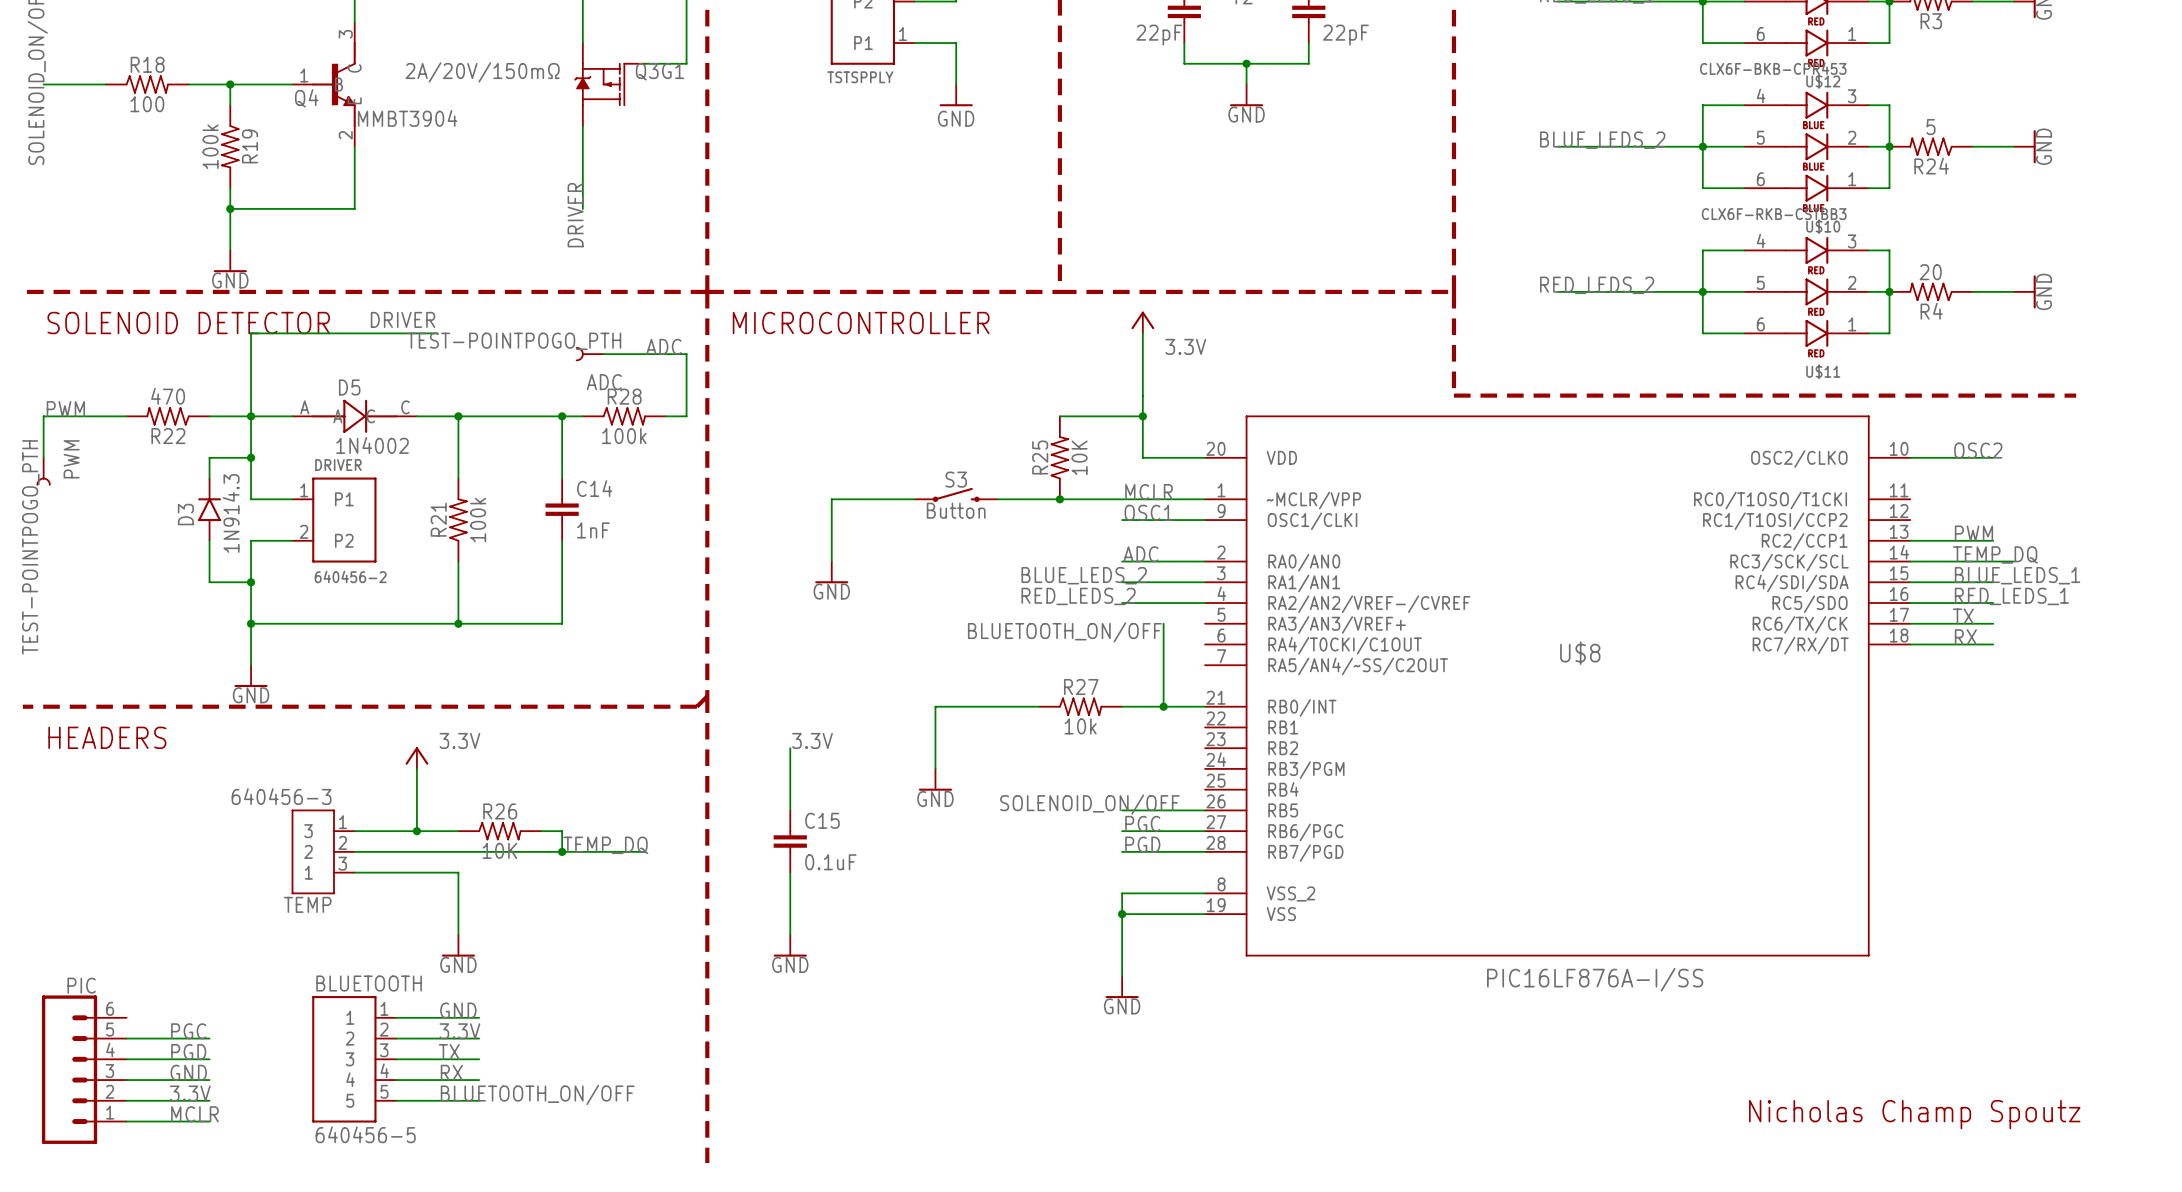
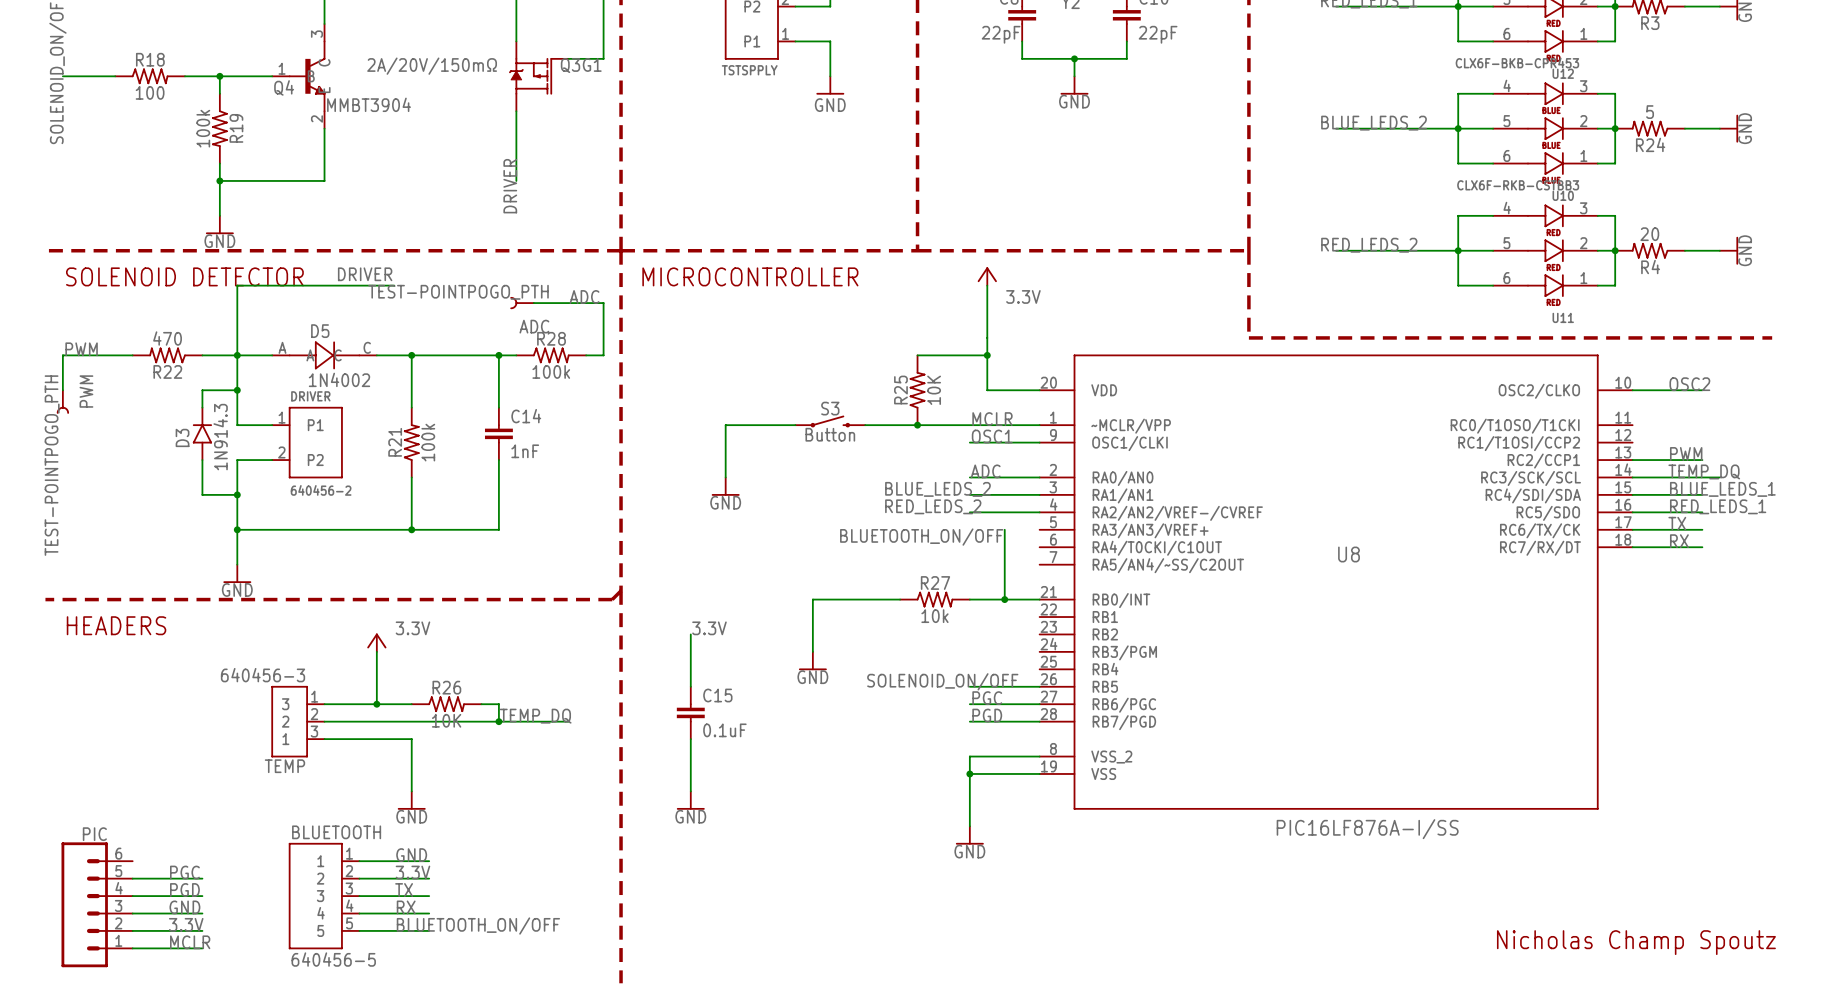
U$12 name: U$12 (1823, 81) -> U12 (1563, 73)
U$10 name: U$10 (1823, 226) -> U10 (1563, 195)
U$11 name: U$11 (1823, 371) -> U11 (1563, 317)
U$8 name: U$8 (1580, 653) -> U8 (1349, 554)

